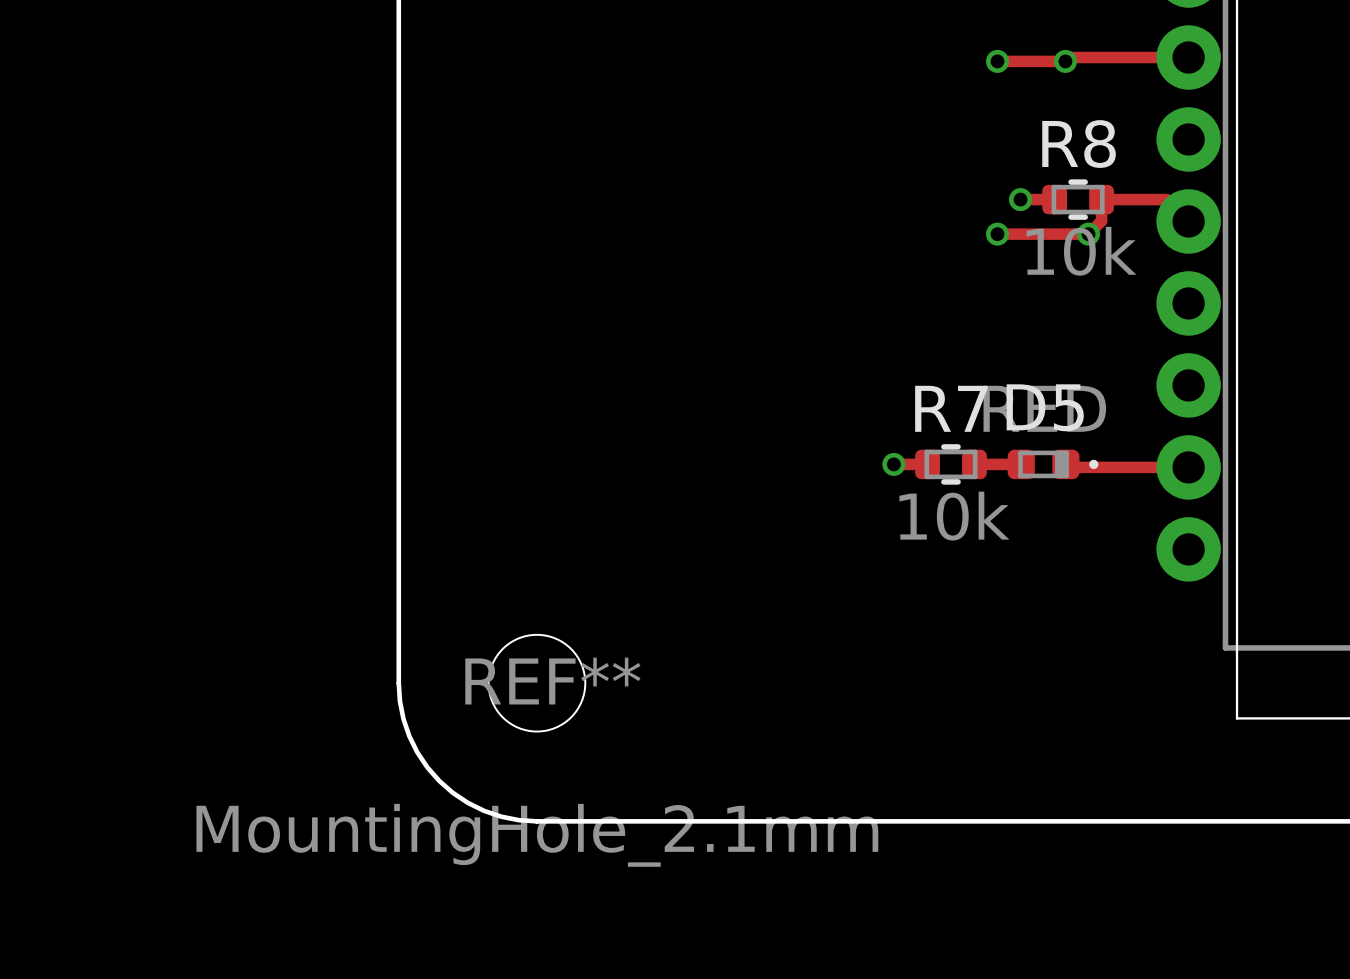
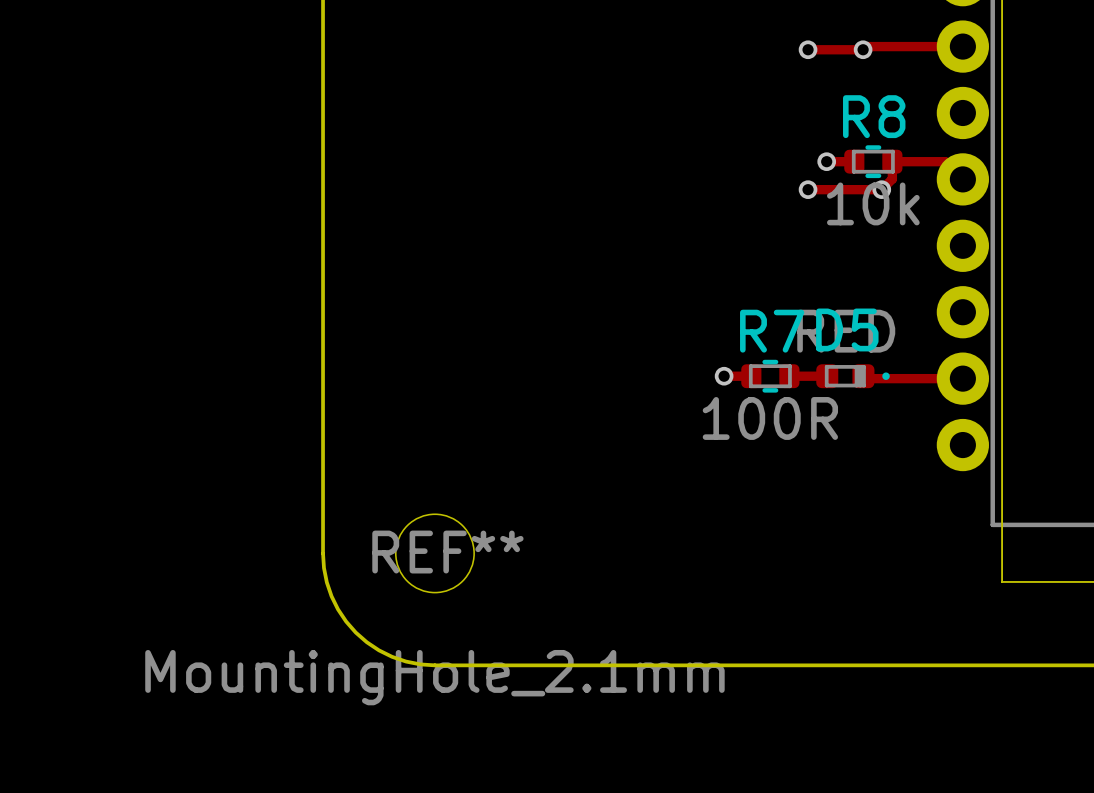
R7 value: 10k (954, 516) -> 100R (770, 418)

